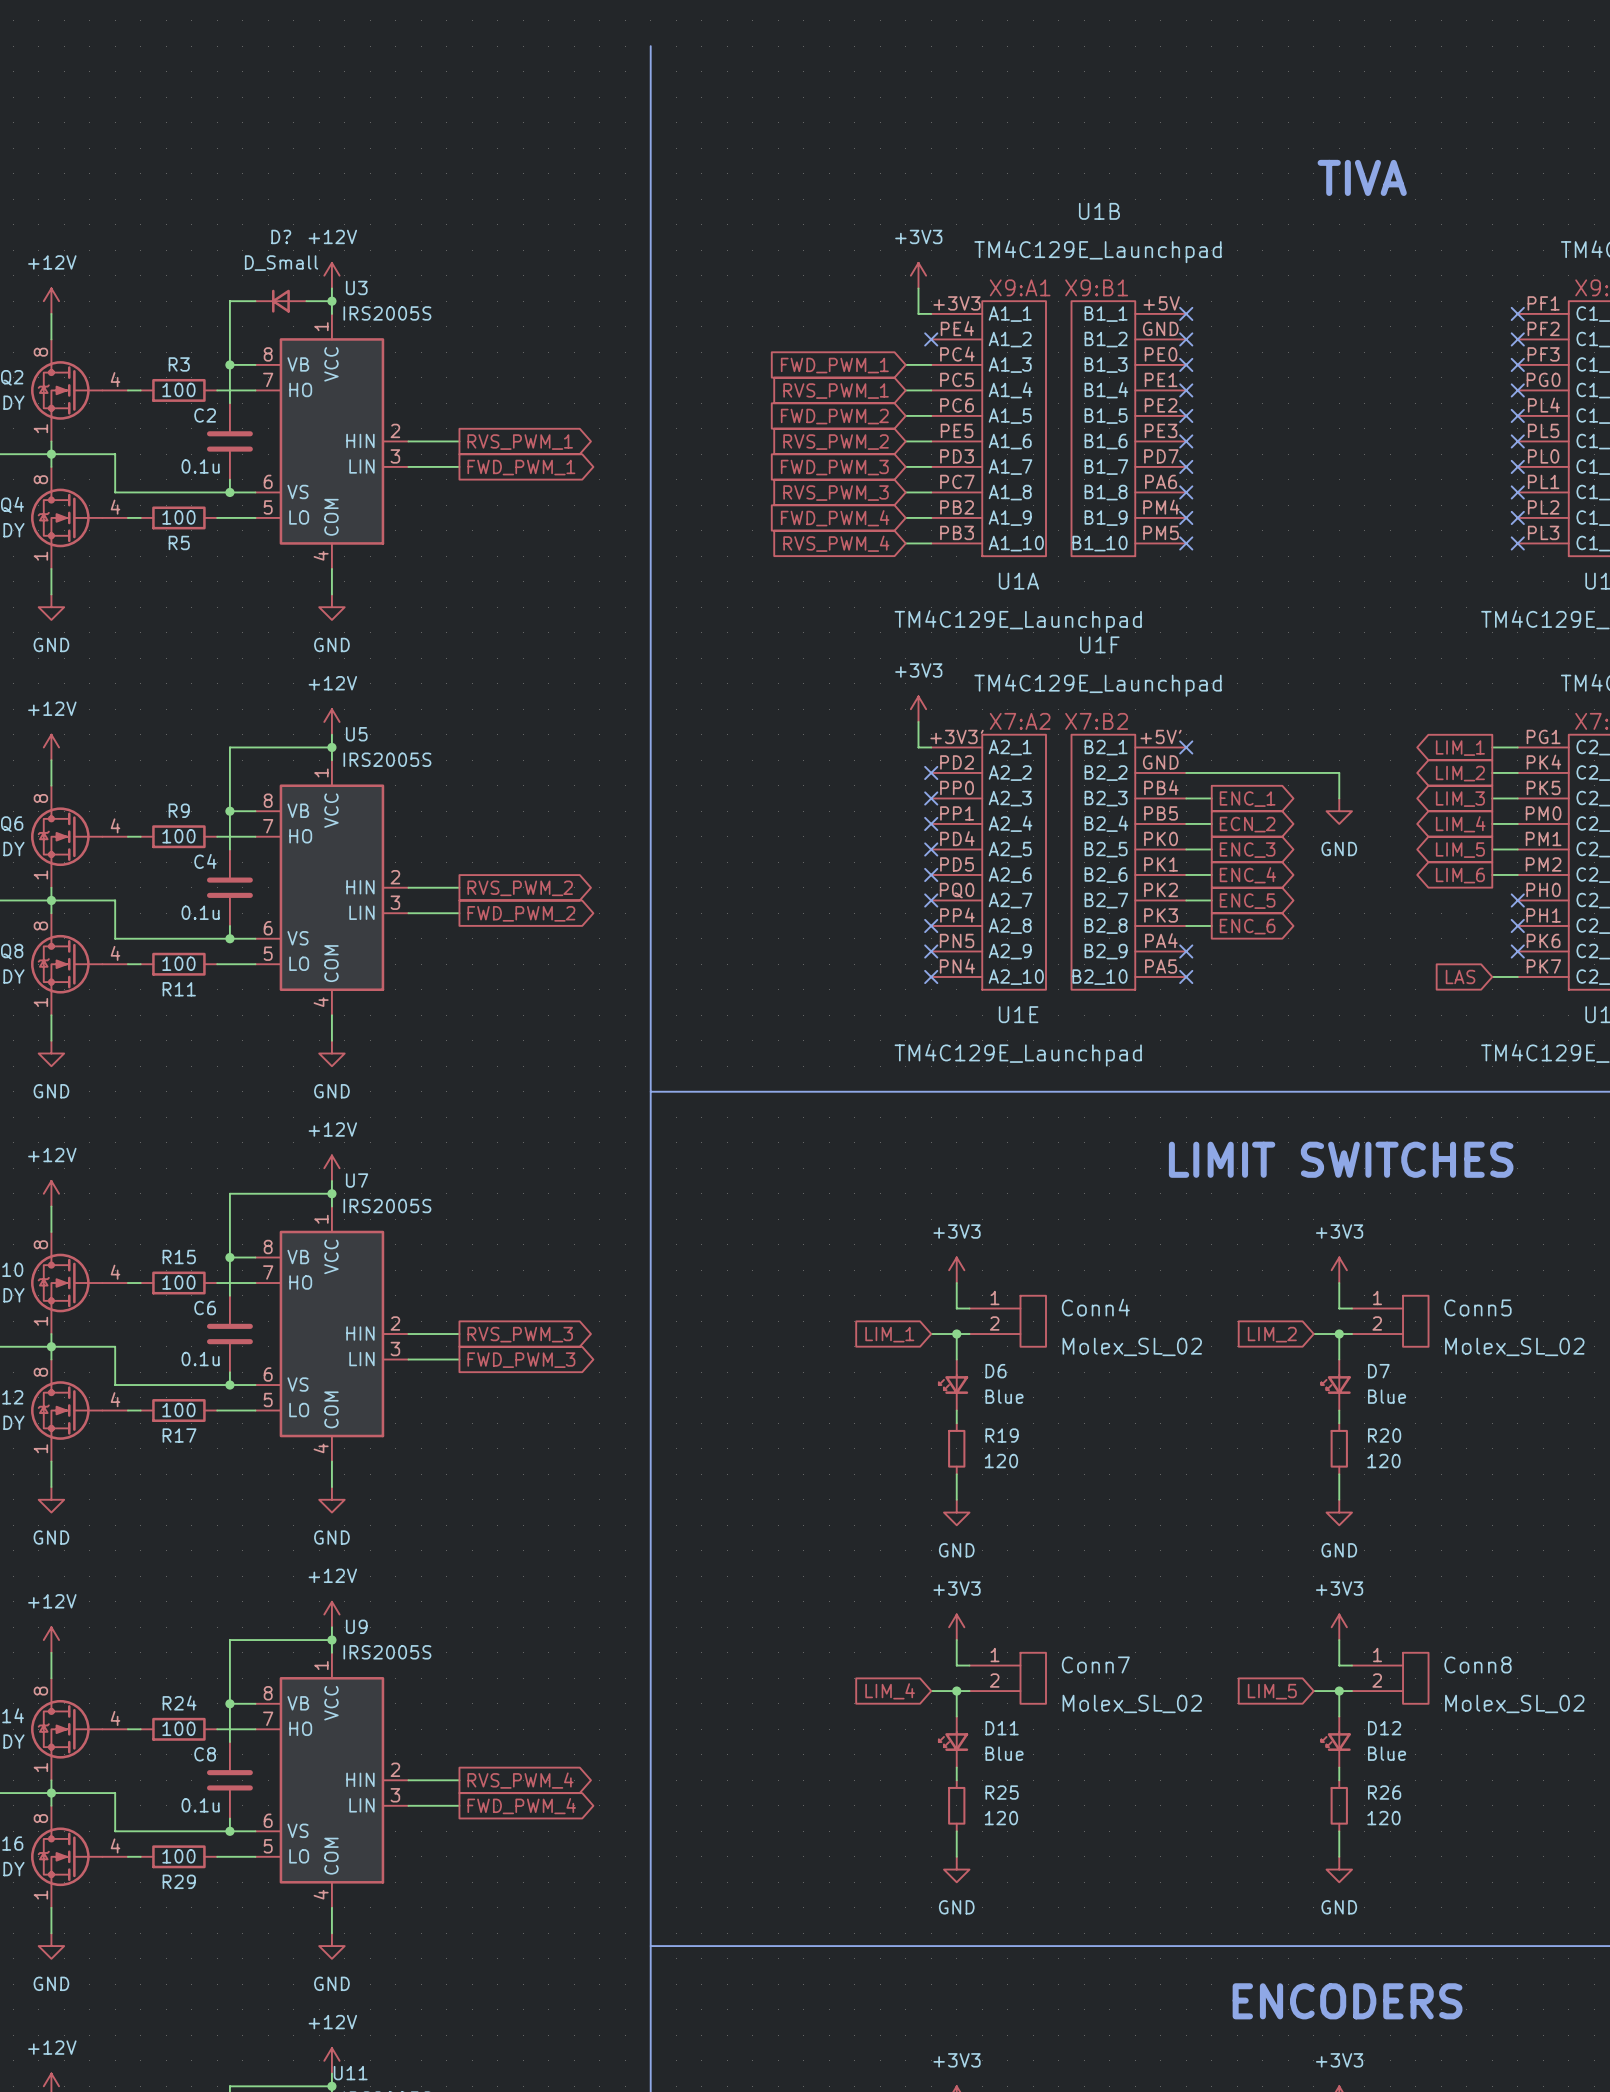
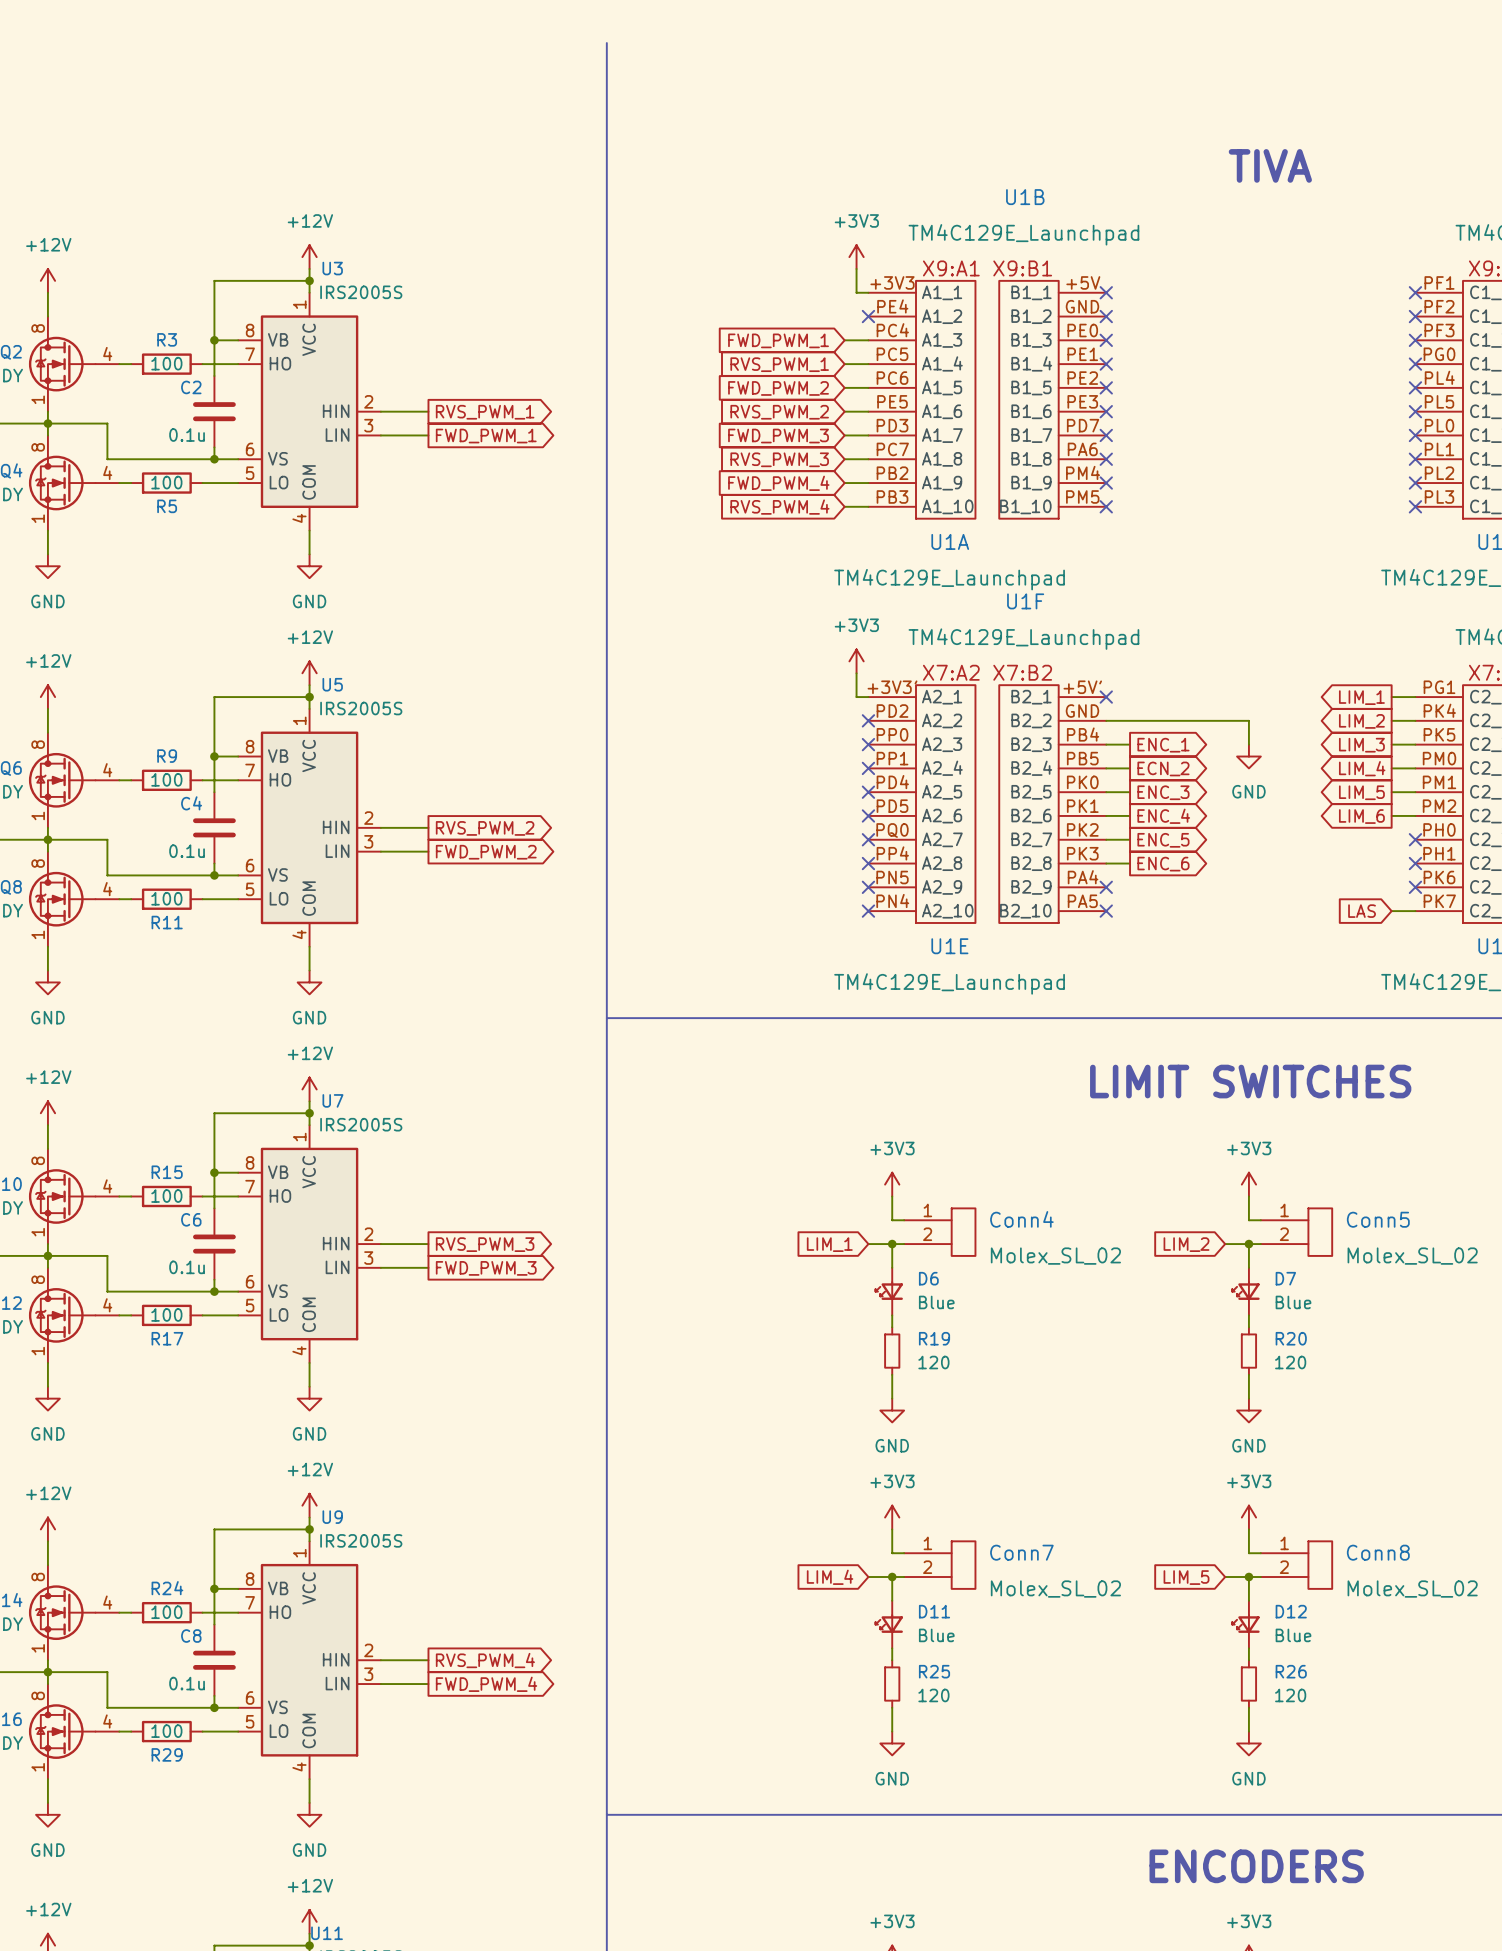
D?: D_Small (280, 301) -> none

